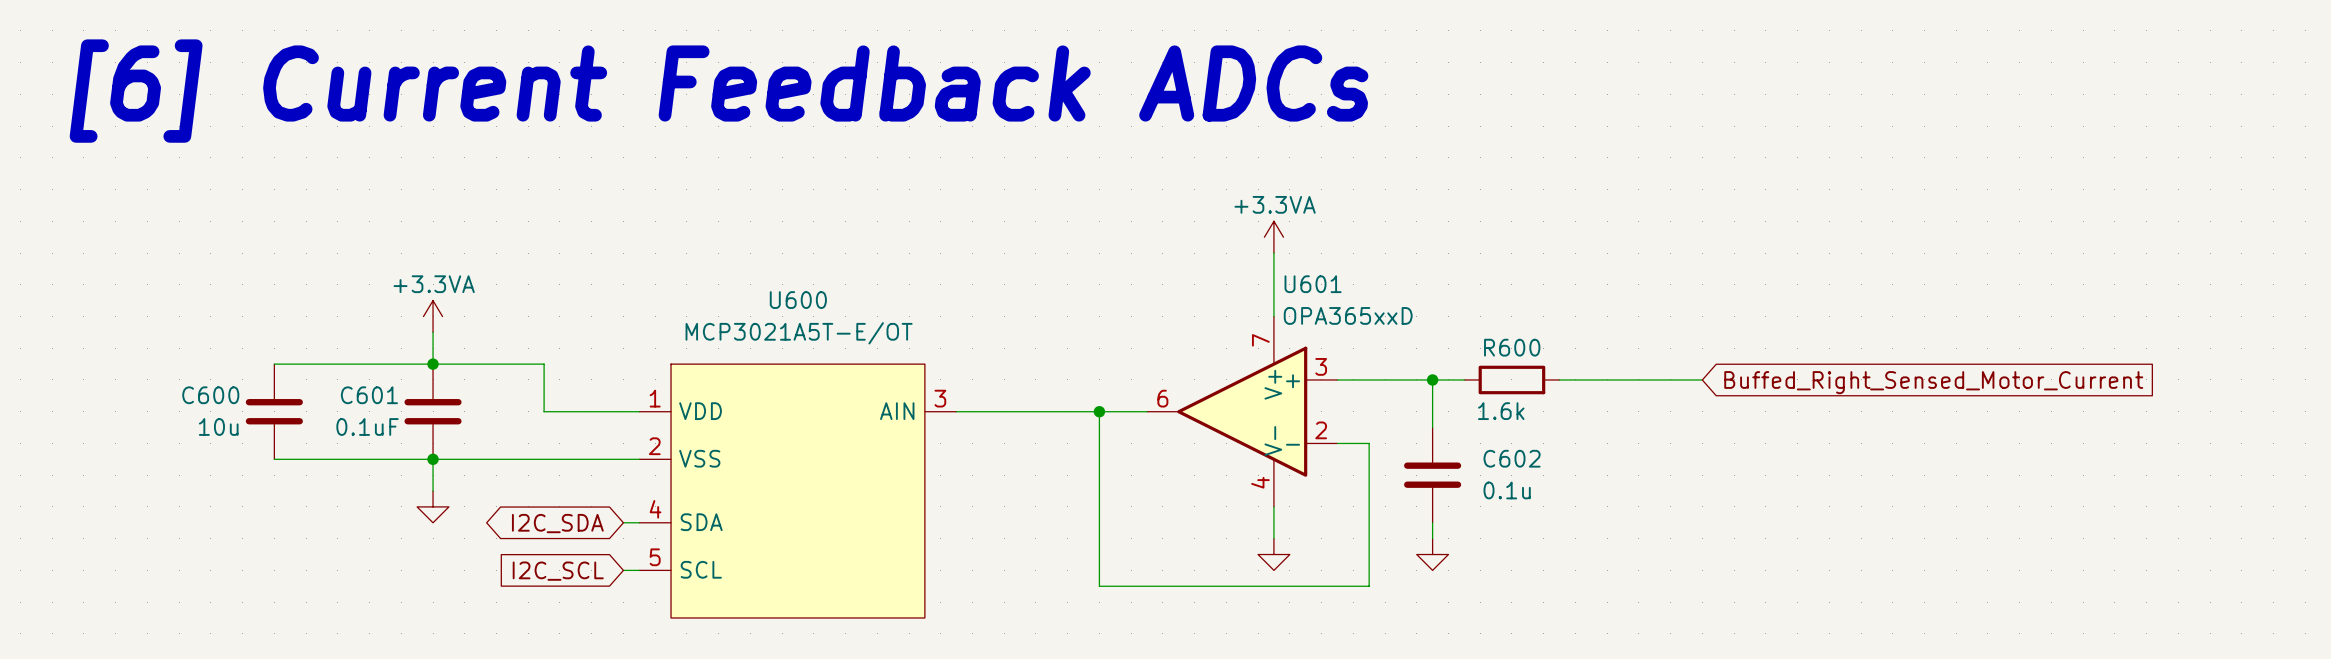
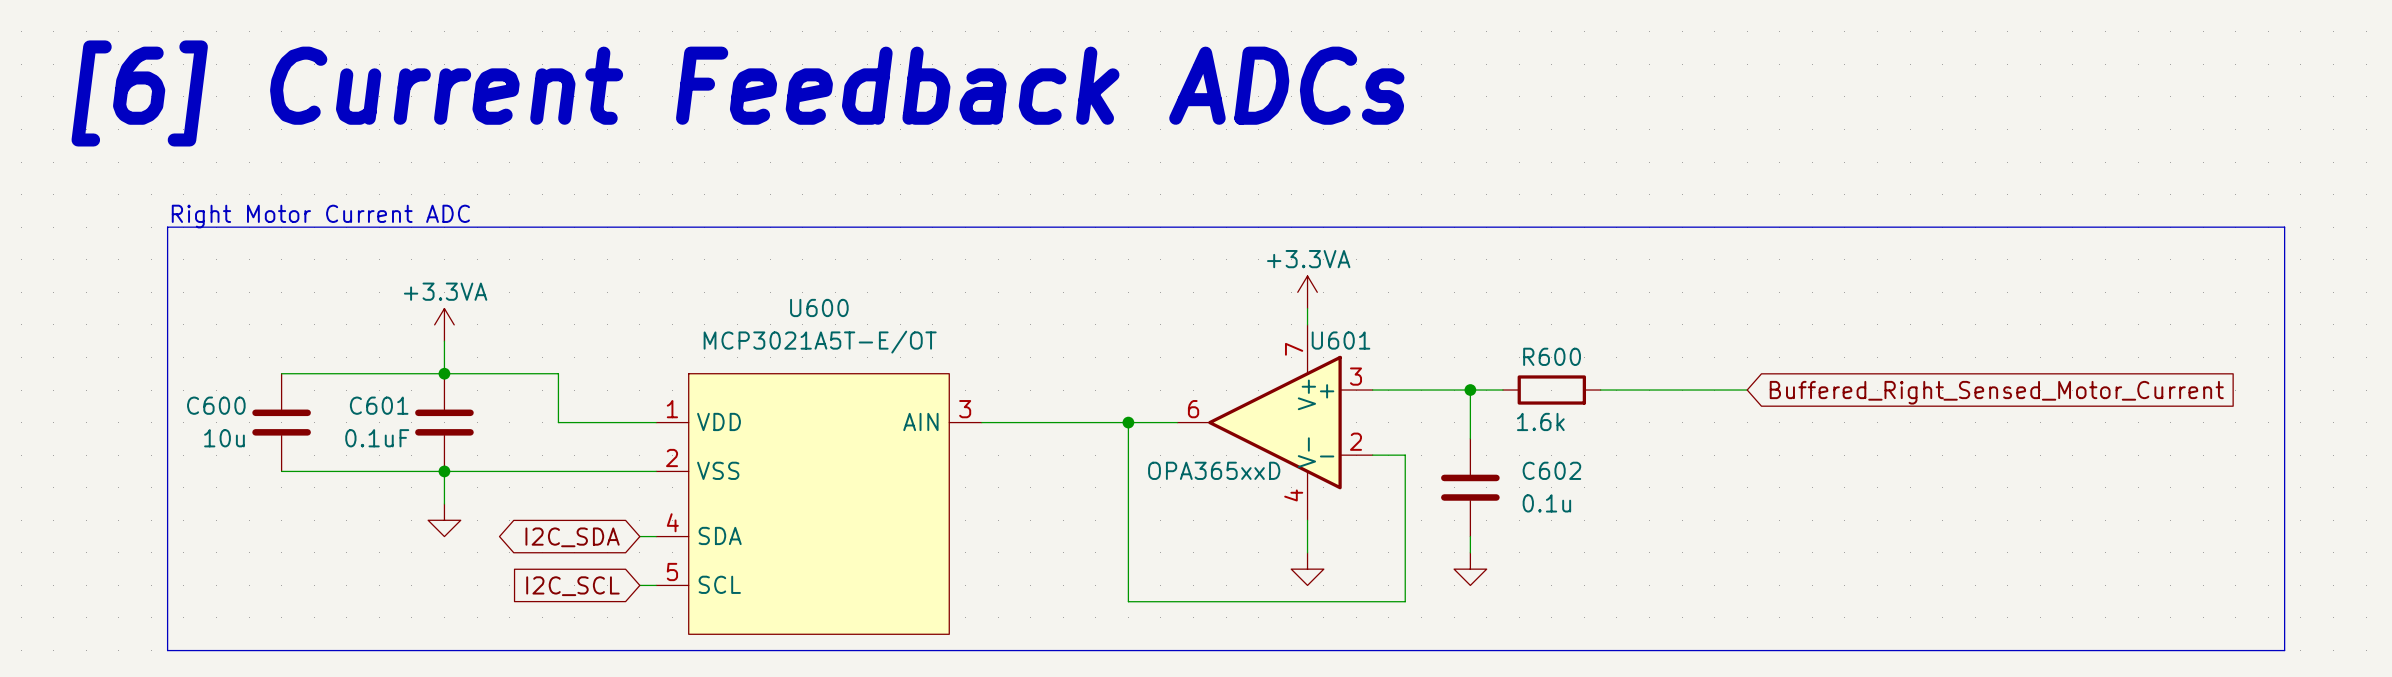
text: none -> Right Motor Current ADC (320, 216)
line: none -> (167, 227) (2284, 227) (2284, 650) (167, 650) (167, 227)
power symbol position: +3.3VA (1273, 237) -> +3.3VA (1307, 292)
U601 name position: U601 (1313, 284) -> U601 (1341, 340)
U601 value position: OPA365xxD (1348, 315) -> OPA365xxD (1214, 470)
global label: Buffed_Right_Sensed_Motor_Current (1933, 382) -> Buffered_Right_Sensed_Motor_Current (1996, 392)

